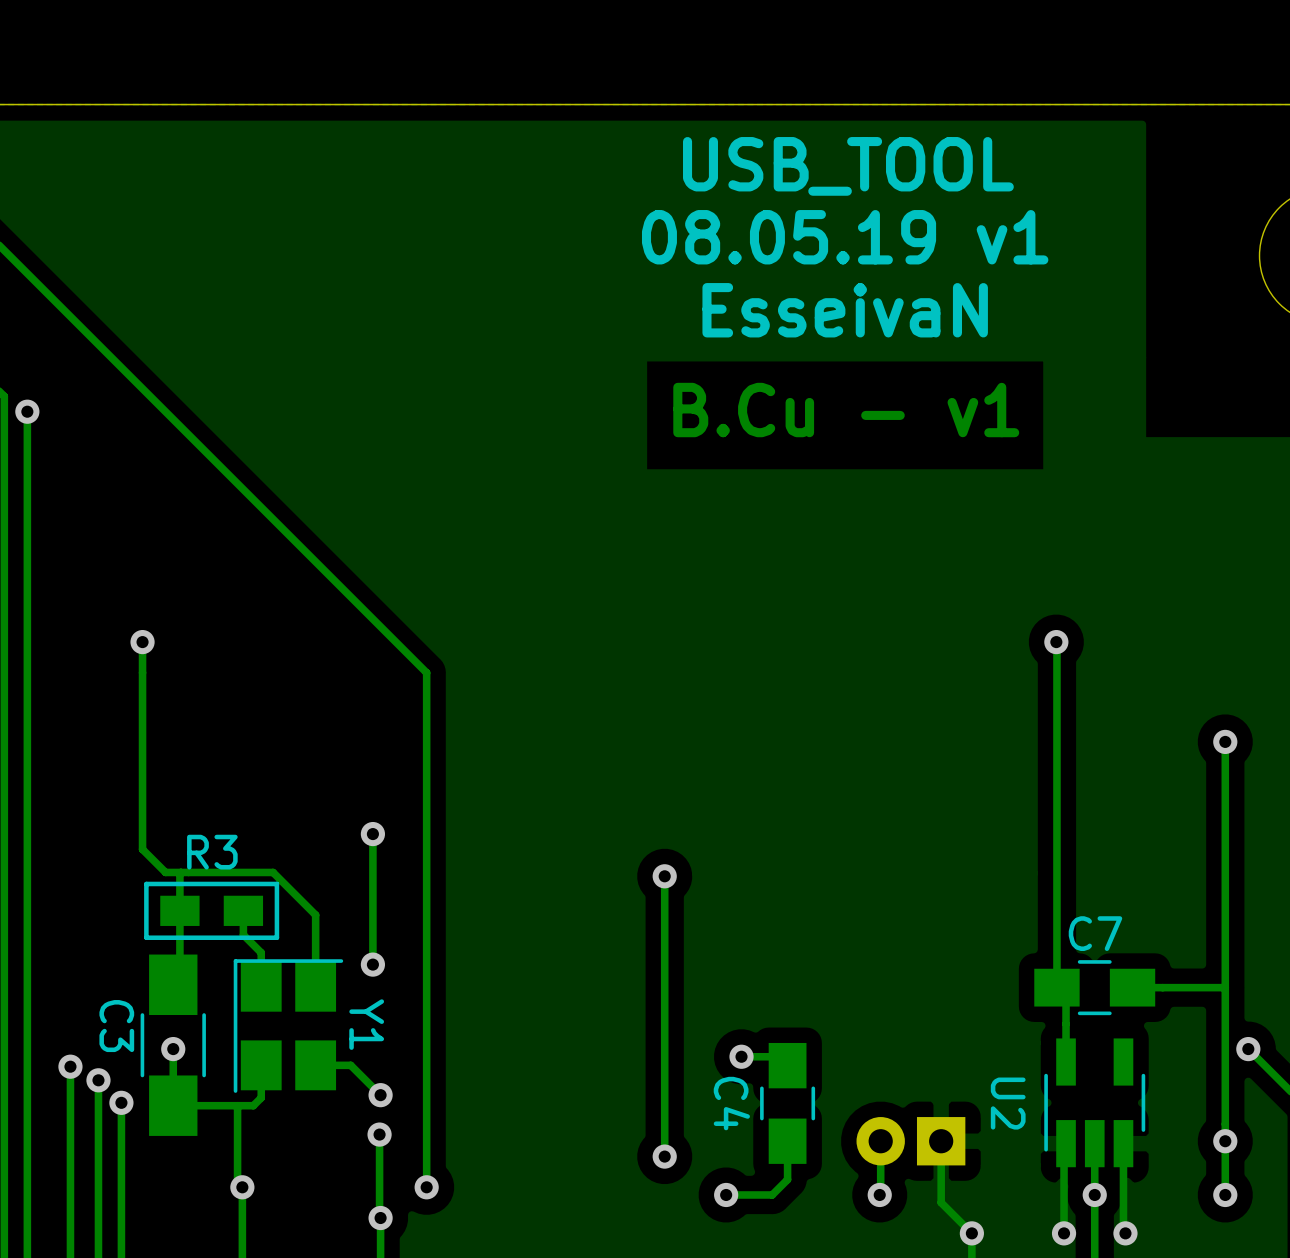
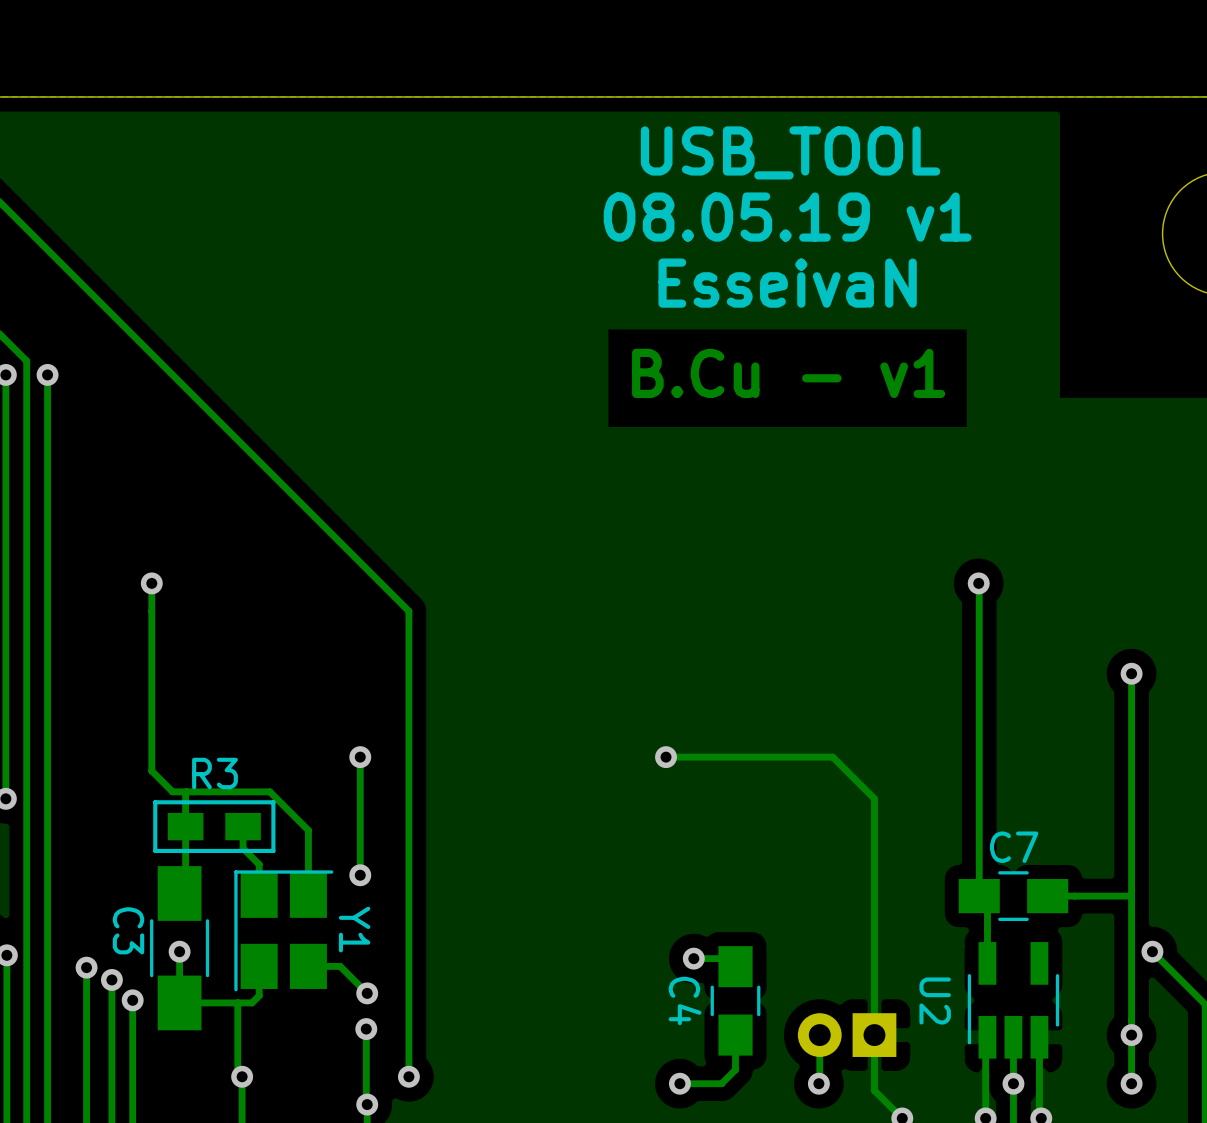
track: none -> (666, 757) (832, 757) (874, 798) (874, 1035)
track: (664, 876) (664, 1156) -> none
via position: (664, 876) -> (666, 757)
via: (664, 1156) -> none

